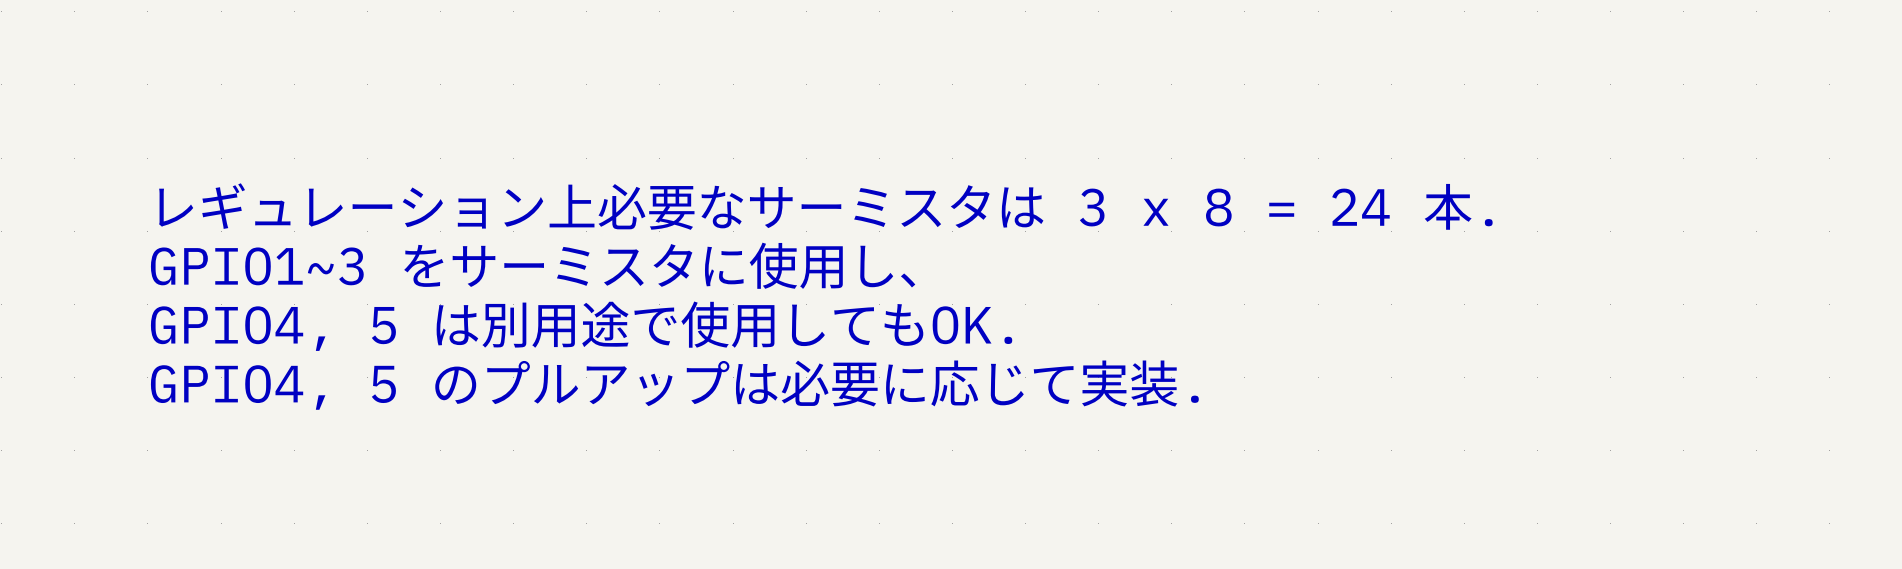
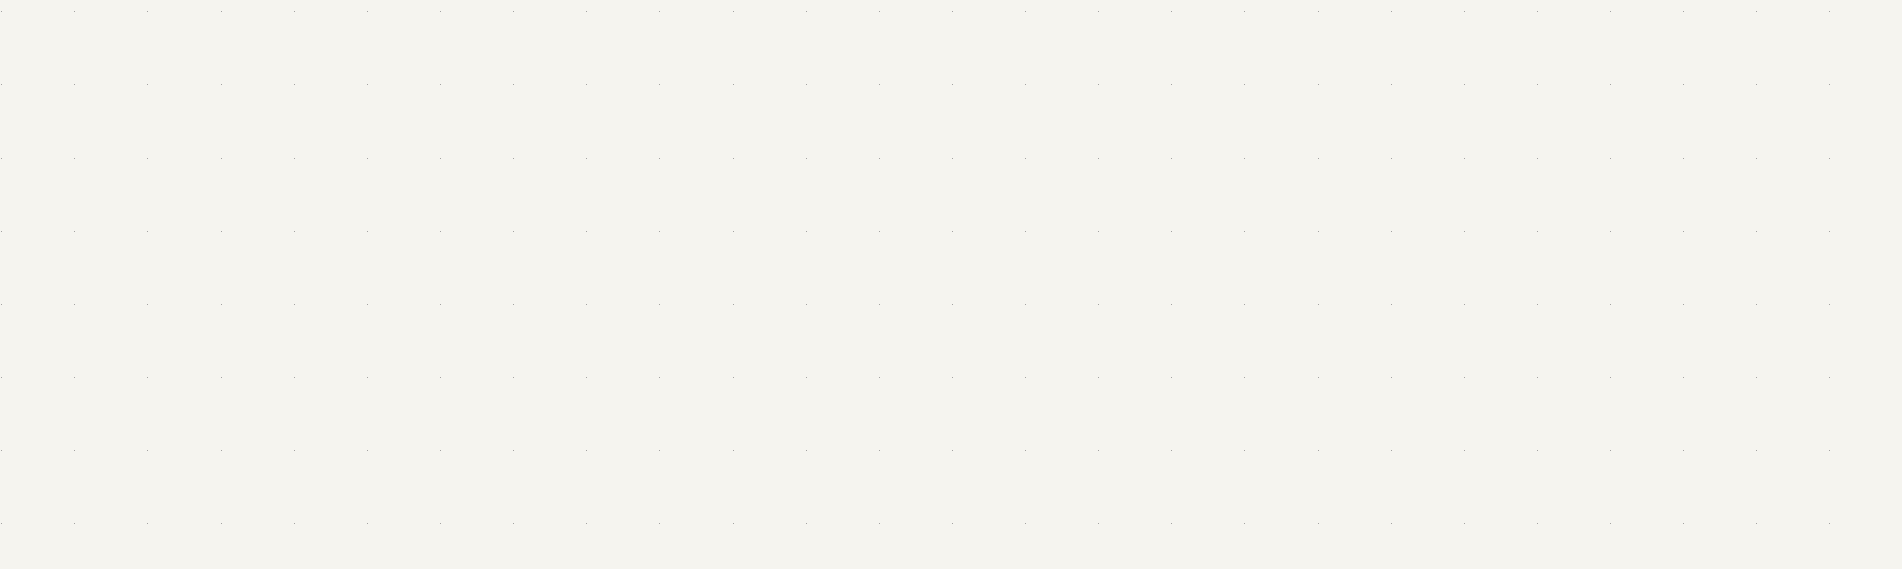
text: レギュレーション上必要なサーミスタは 3 x 8 = 24 本. (825, 206) -> none
text: GPIO1~3 をサーミスタに使用し、 (533, 265) -> none
text: GPIO4, 5 は別用途で使用してもOK. (581, 326) -> none
text: GPIO4, 5 のプルアップは必要に応じて実装. (674, 385) -> none

